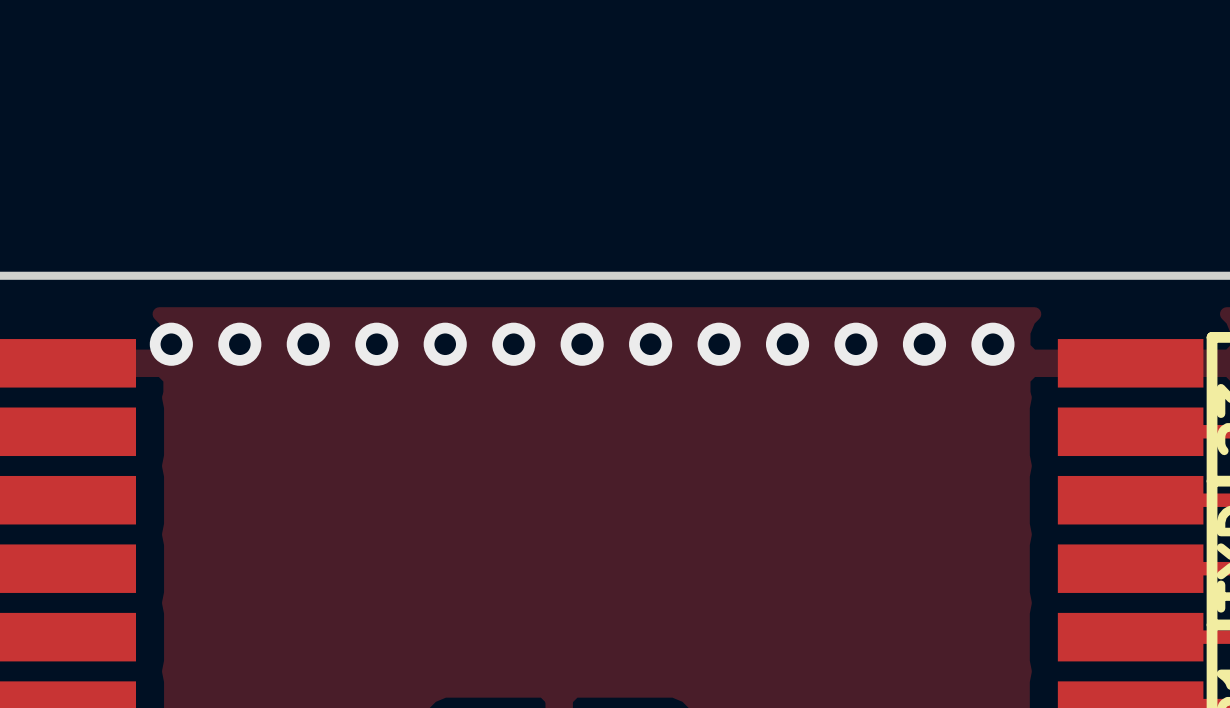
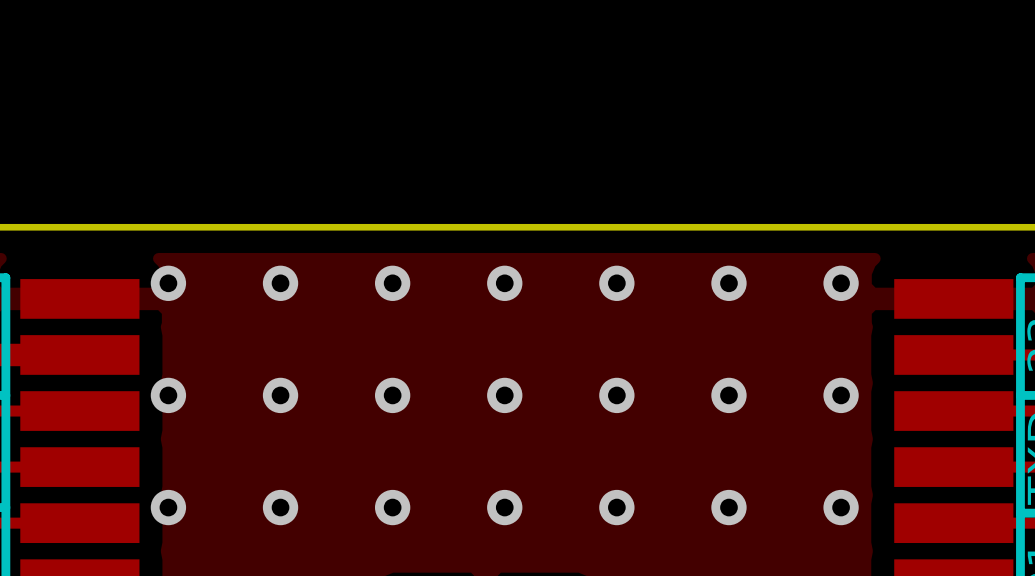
via: (239, 344) -> none
via: (376, 344) -> none
via: (513, 344) -> none
via: (650, 344) -> none
via: (787, 344) -> none
via: (924, 344) -> none
via: none -> (168, 395)
via: none -> (280, 395)
via: none -> (392, 395)
via: none -> (504, 395)
via: none -> (616, 395)
via: none -> (728, 395)
via: none -> (841, 395)
via: none -> (168, 507)
via: none -> (280, 507)
via: none -> (392, 507)
via: none -> (504, 507)
via: none -> (616, 507)
via: none -> (728, 507)
via: none -> (841, 507)

